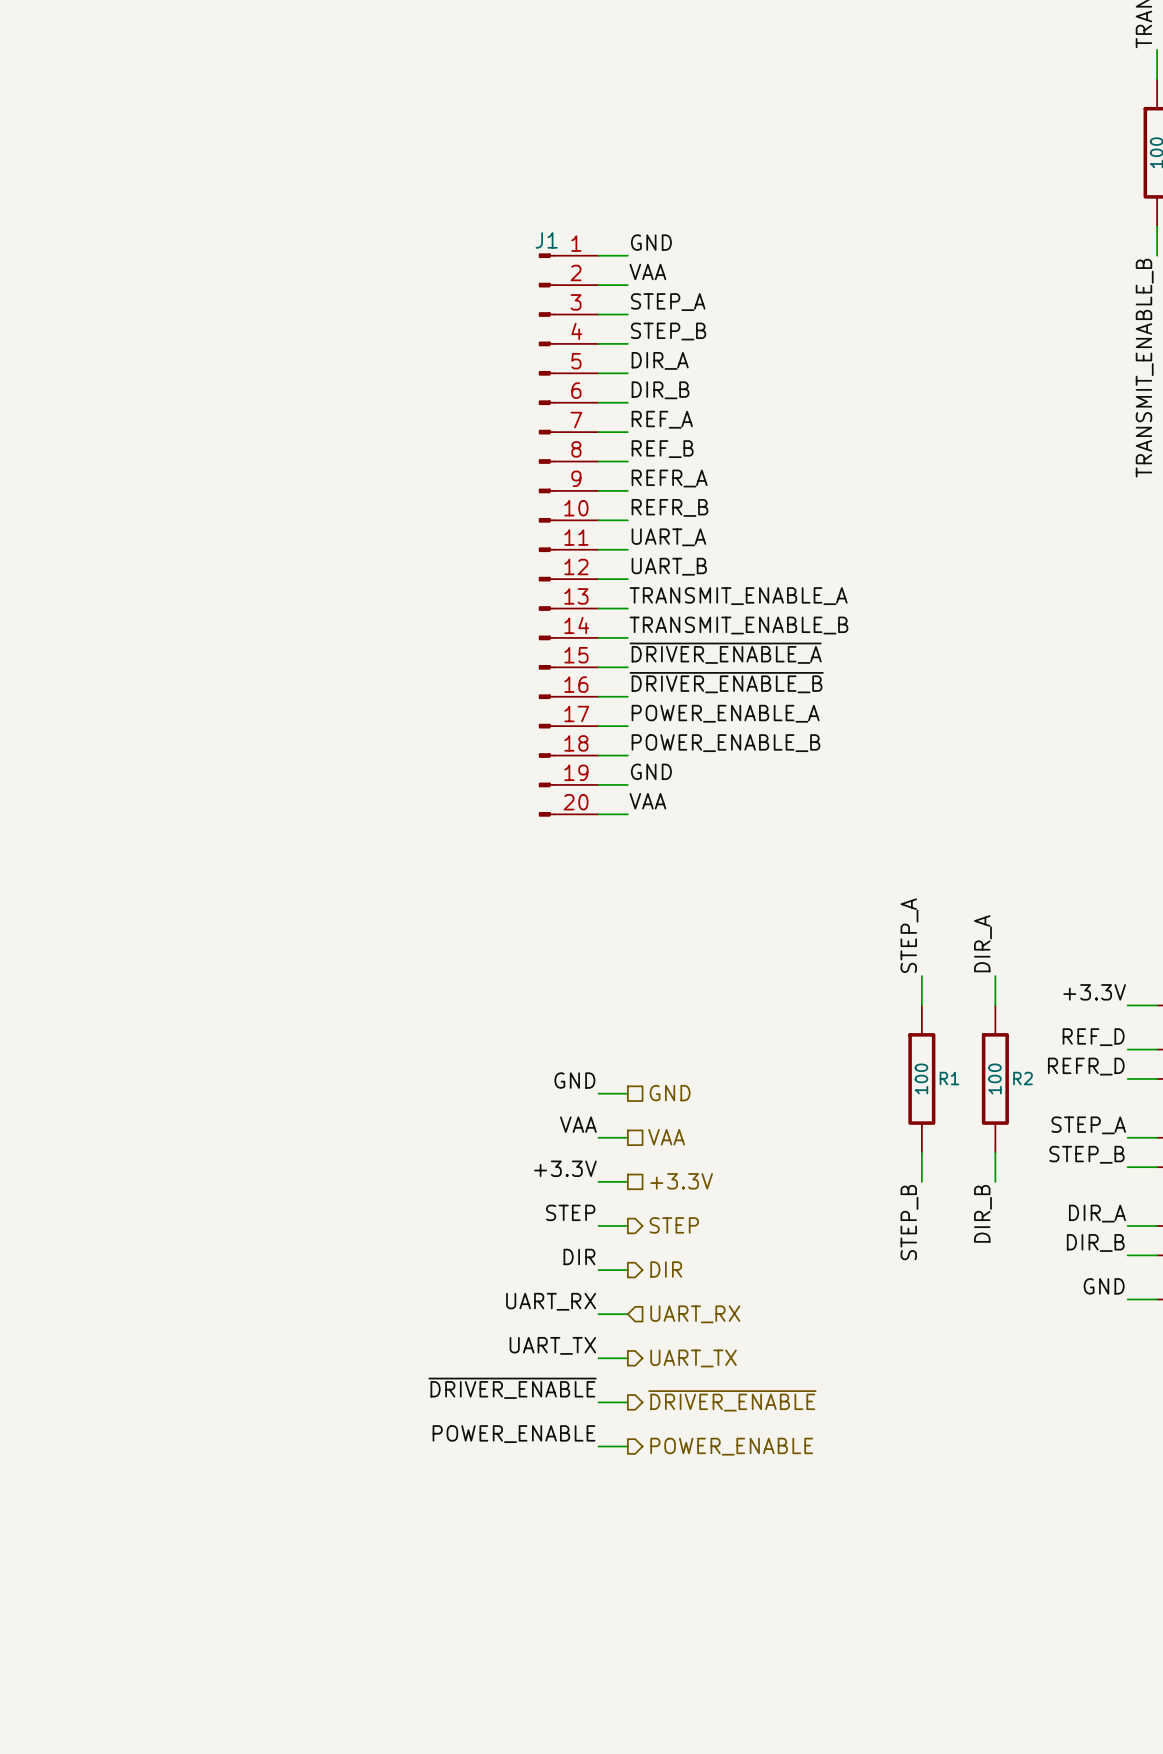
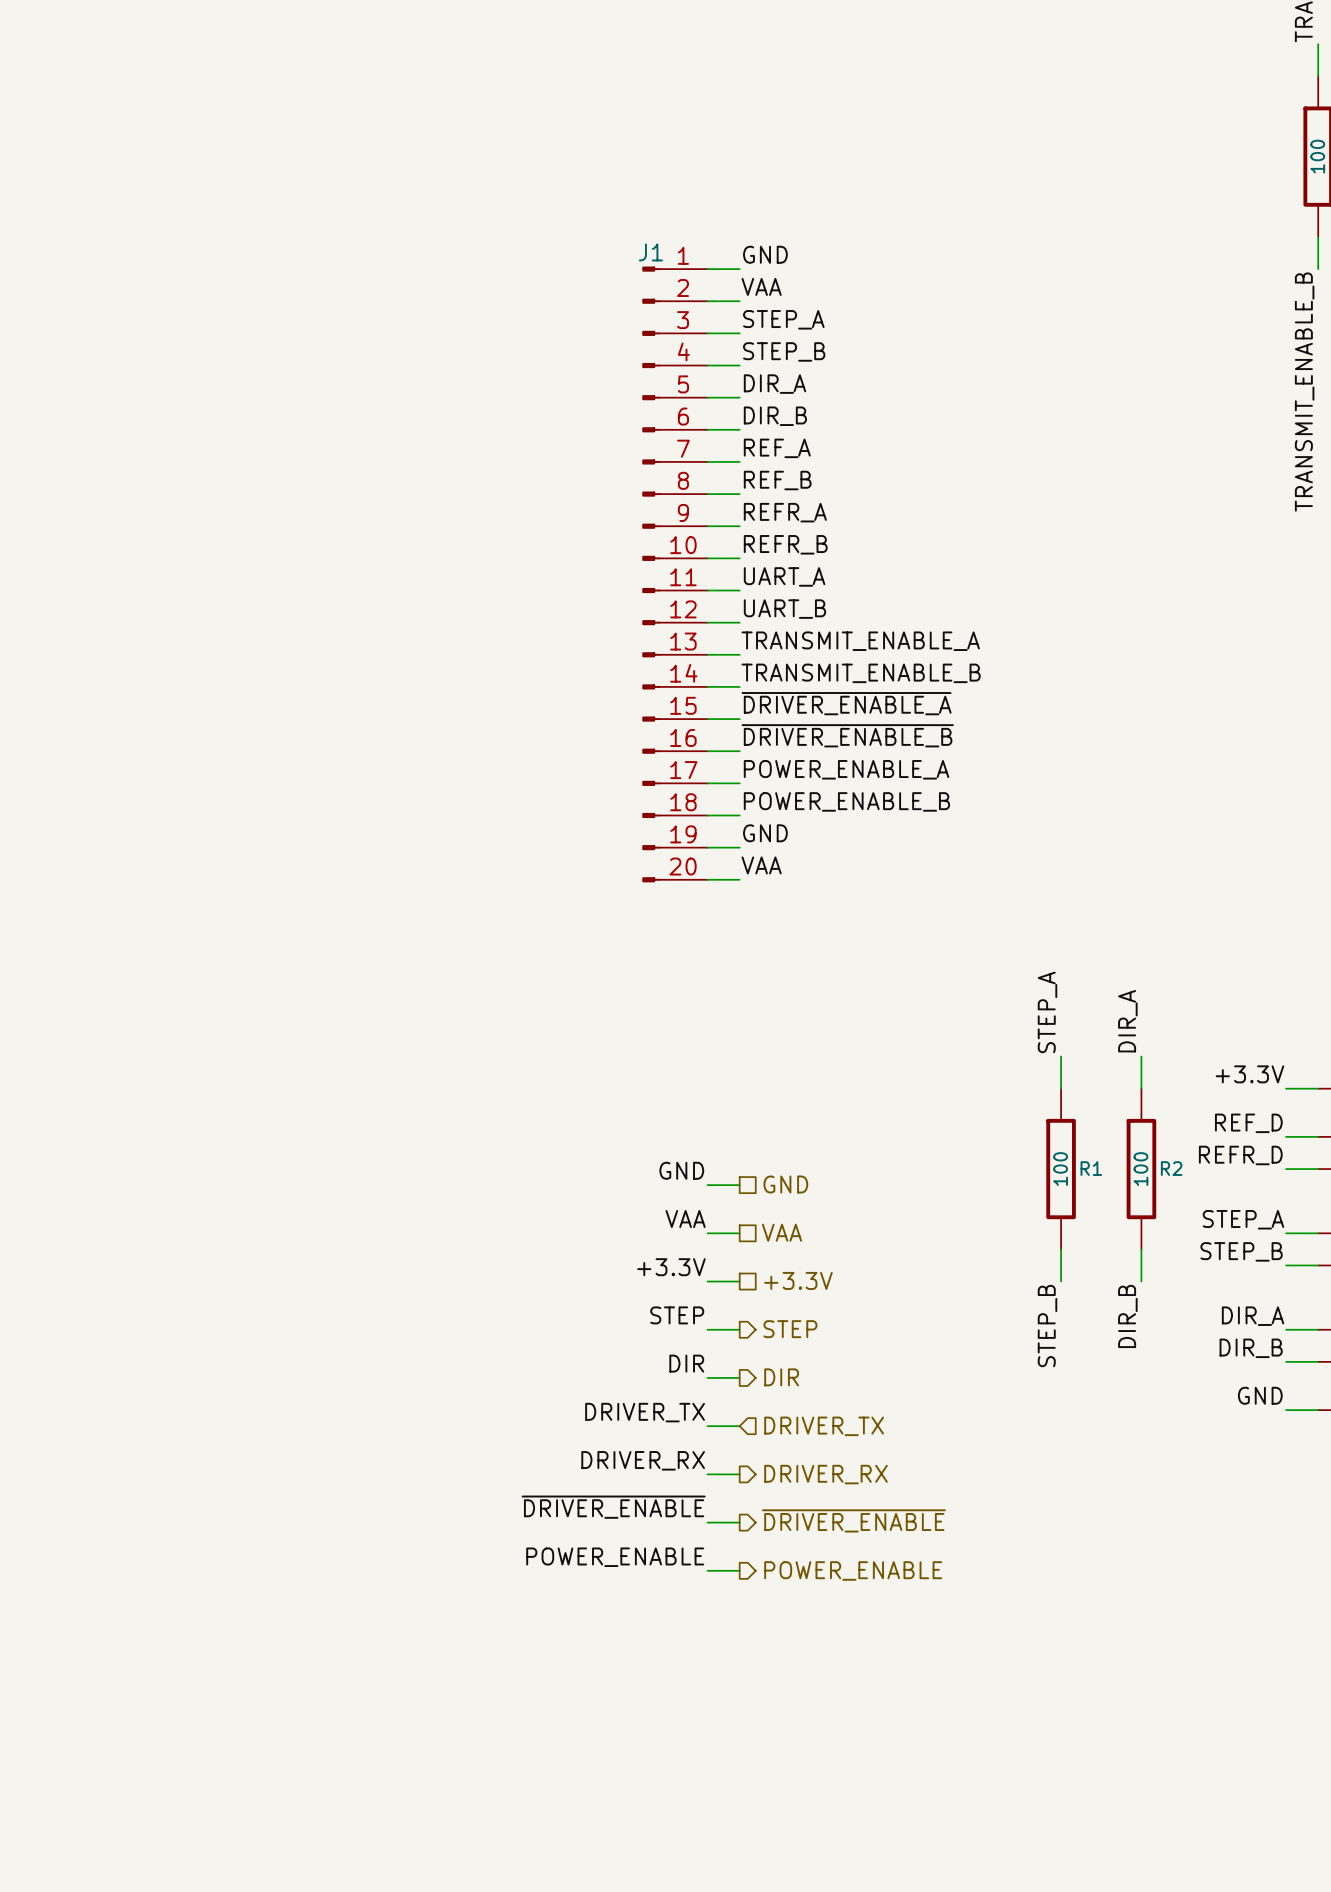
label: UART_RX (551, 1301) -> DRIVER_TX (645, 1412)
hierarchical label: UART_RX (695, 1314) -> DRIVER_TX (824, 1426)
label: UART_TX (552, 1345) -> DRIVER_RX (643, 1460)
hierarchical label: UART_TX (693, 1358) -> DRIVER_RX (826, 1474)

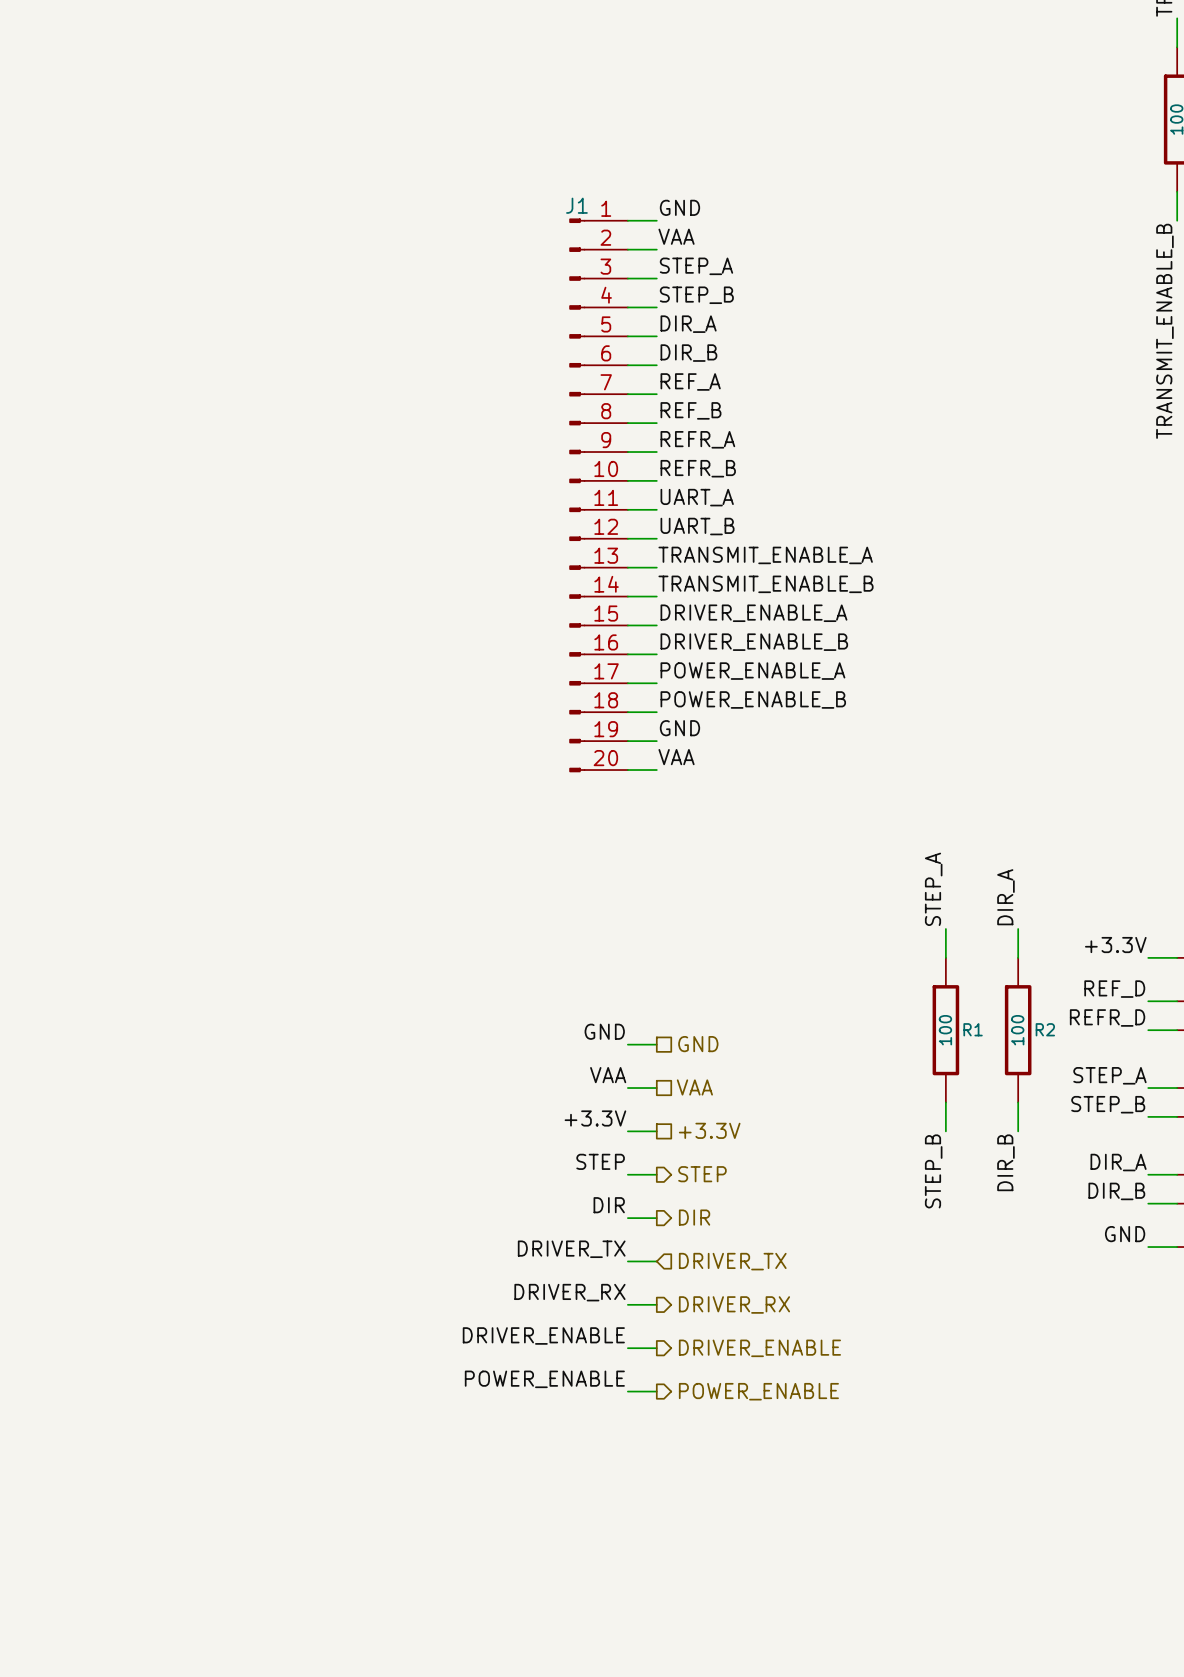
label: ~{DRIVER_ENABLE_A} (846, 703) -> DRIVER_ENABLE_A (753, 613)
label: ~{DRIVER_ENABLE_B} (847, 735) -> DRIVER_ENABLE_B (754, 642)
label: ~{DRIVER_ENABLE} (613, 1507) -> DRIVER_ENABLE (543, 1335)
hierarchical label: ~{DRIVER_ENABLE} (853, 1520) -> DRIVER_ENABLE (759, 1348)

